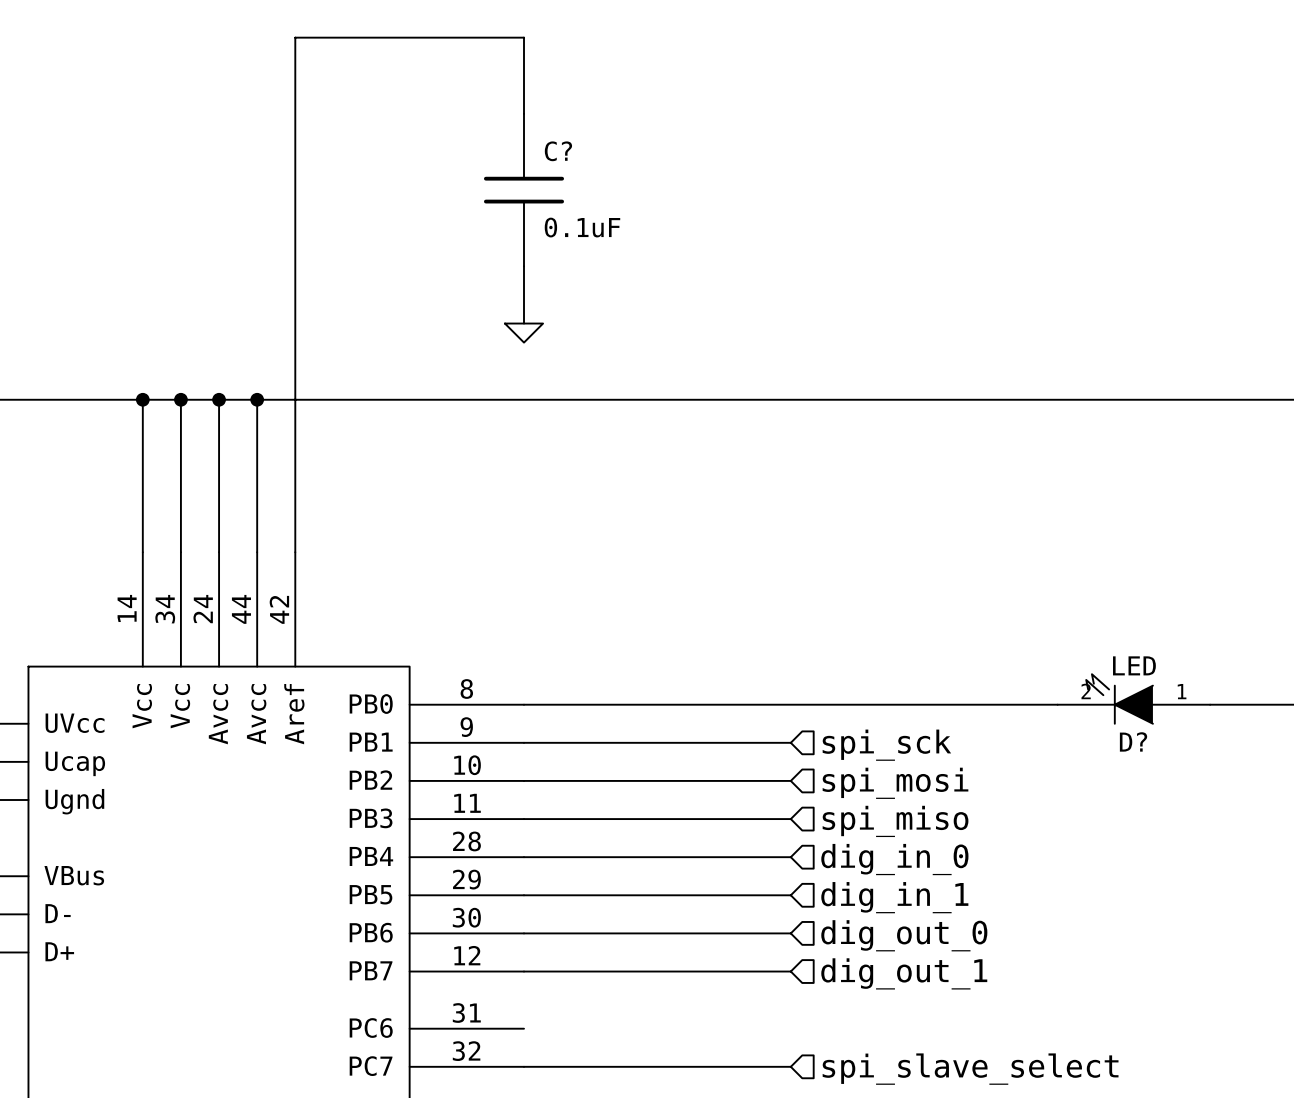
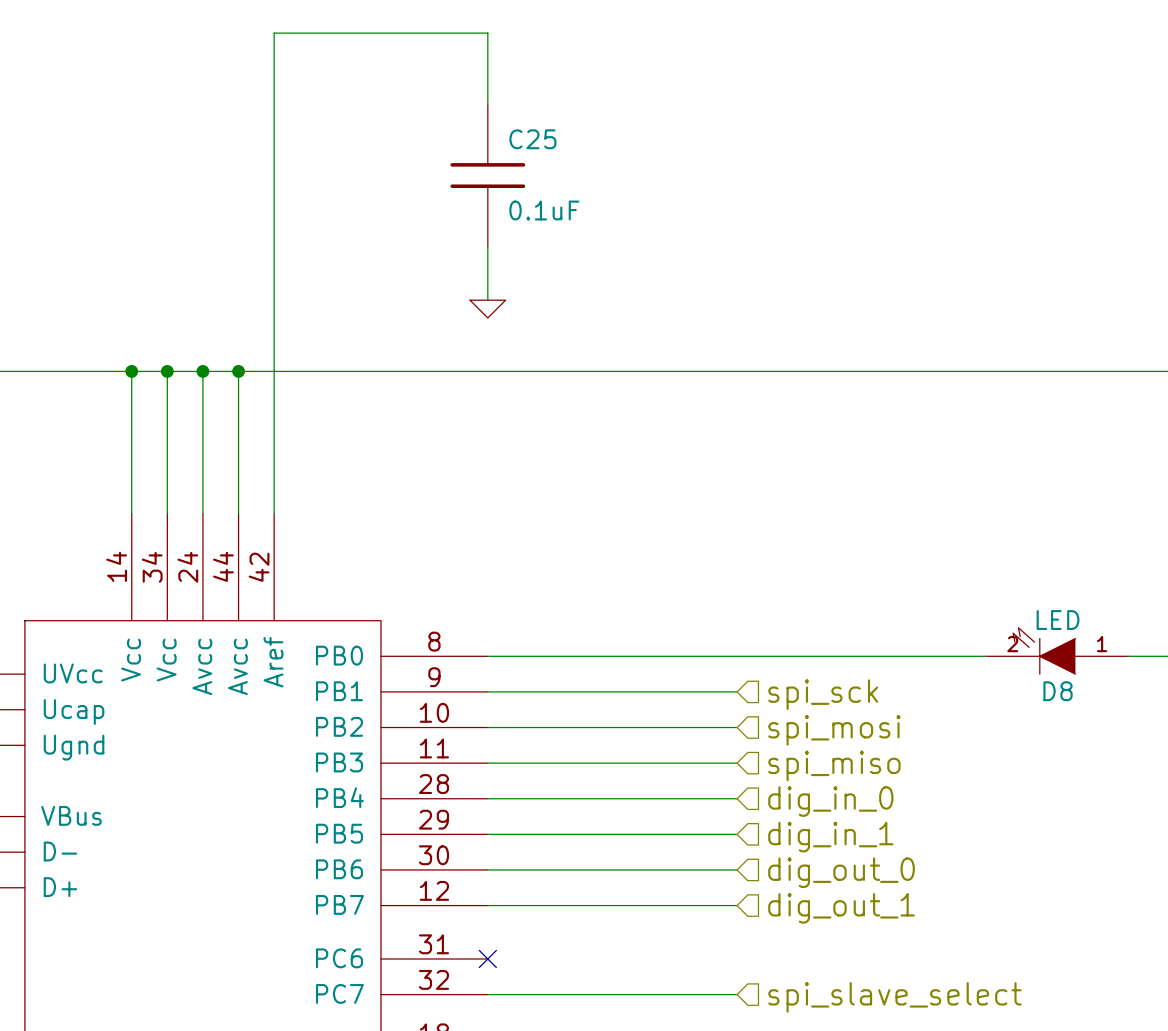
C? name: C? (558, 151) -> C25 (532, 139)
D? name: D? (1133, 741) -> D8 (1058, 691)
no-connect mark: none -> (487, 958)

